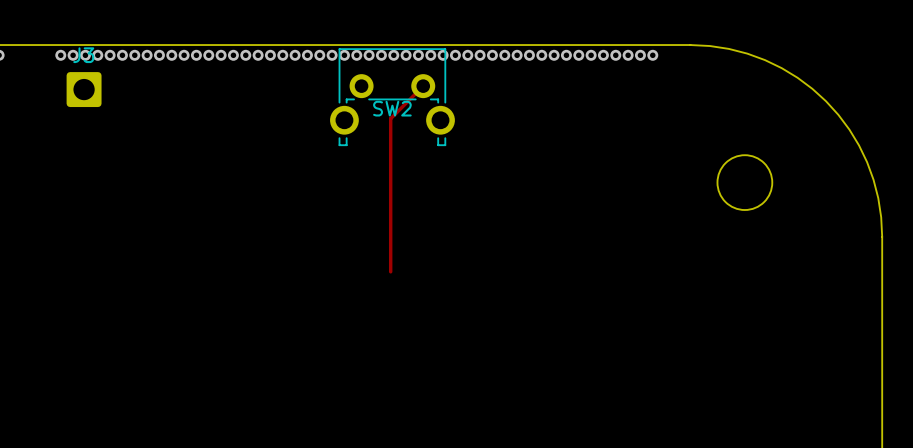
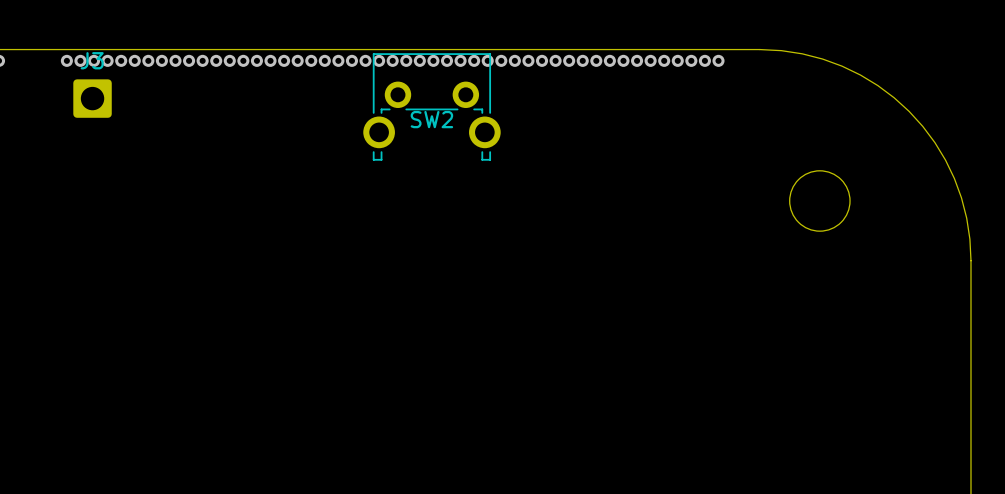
top track: (423, 86) (390, 118) (390, 271) -> none

